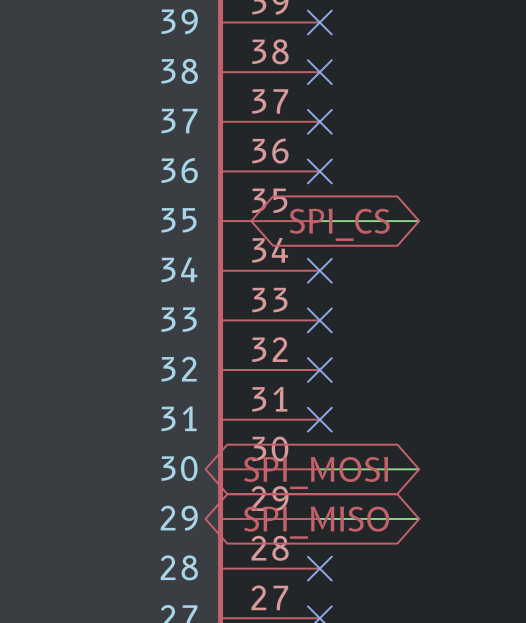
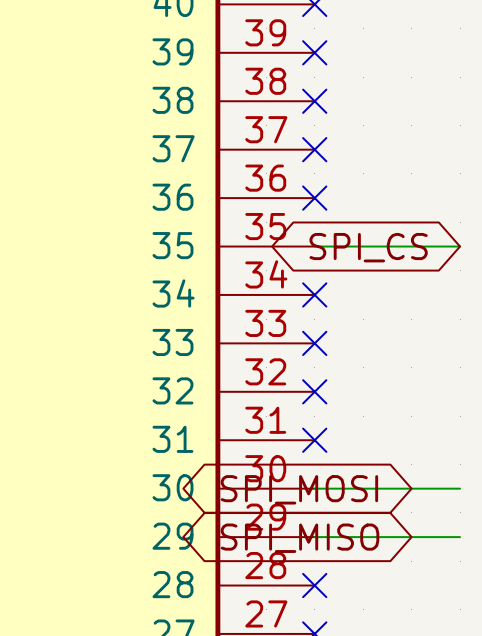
wire: none -> (411, 246) (460, 246)
global label position: SPI_CS (339, 224) -> SPI_CS (368, 247)
wire: none -> (411, 488) (460, 488)
wire: none -> (411, 537) (460, 537)

